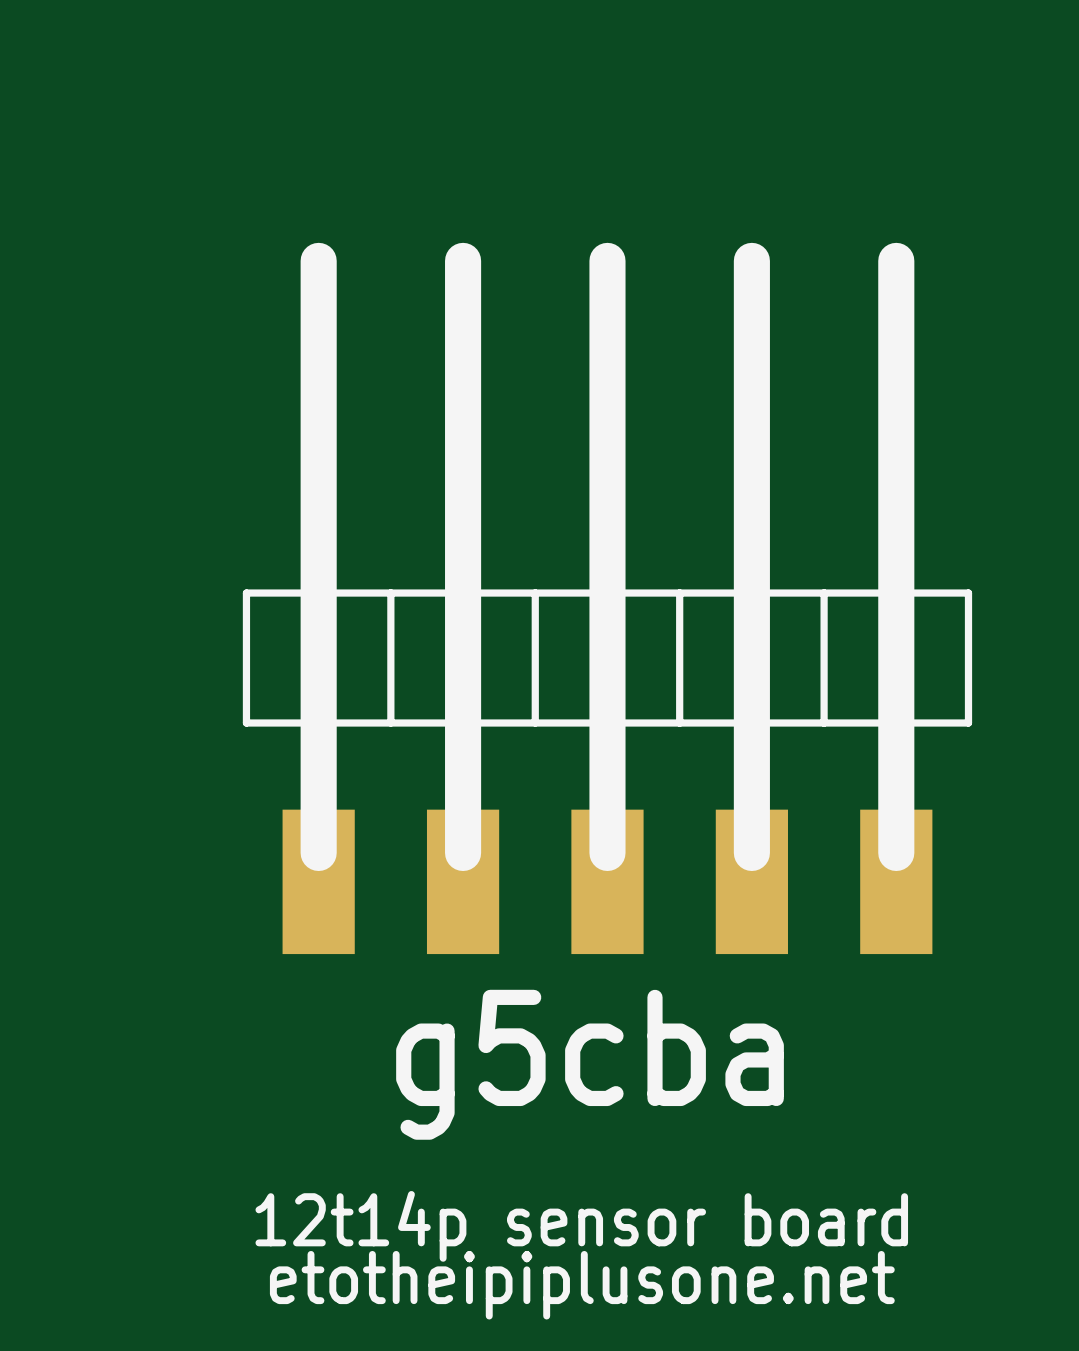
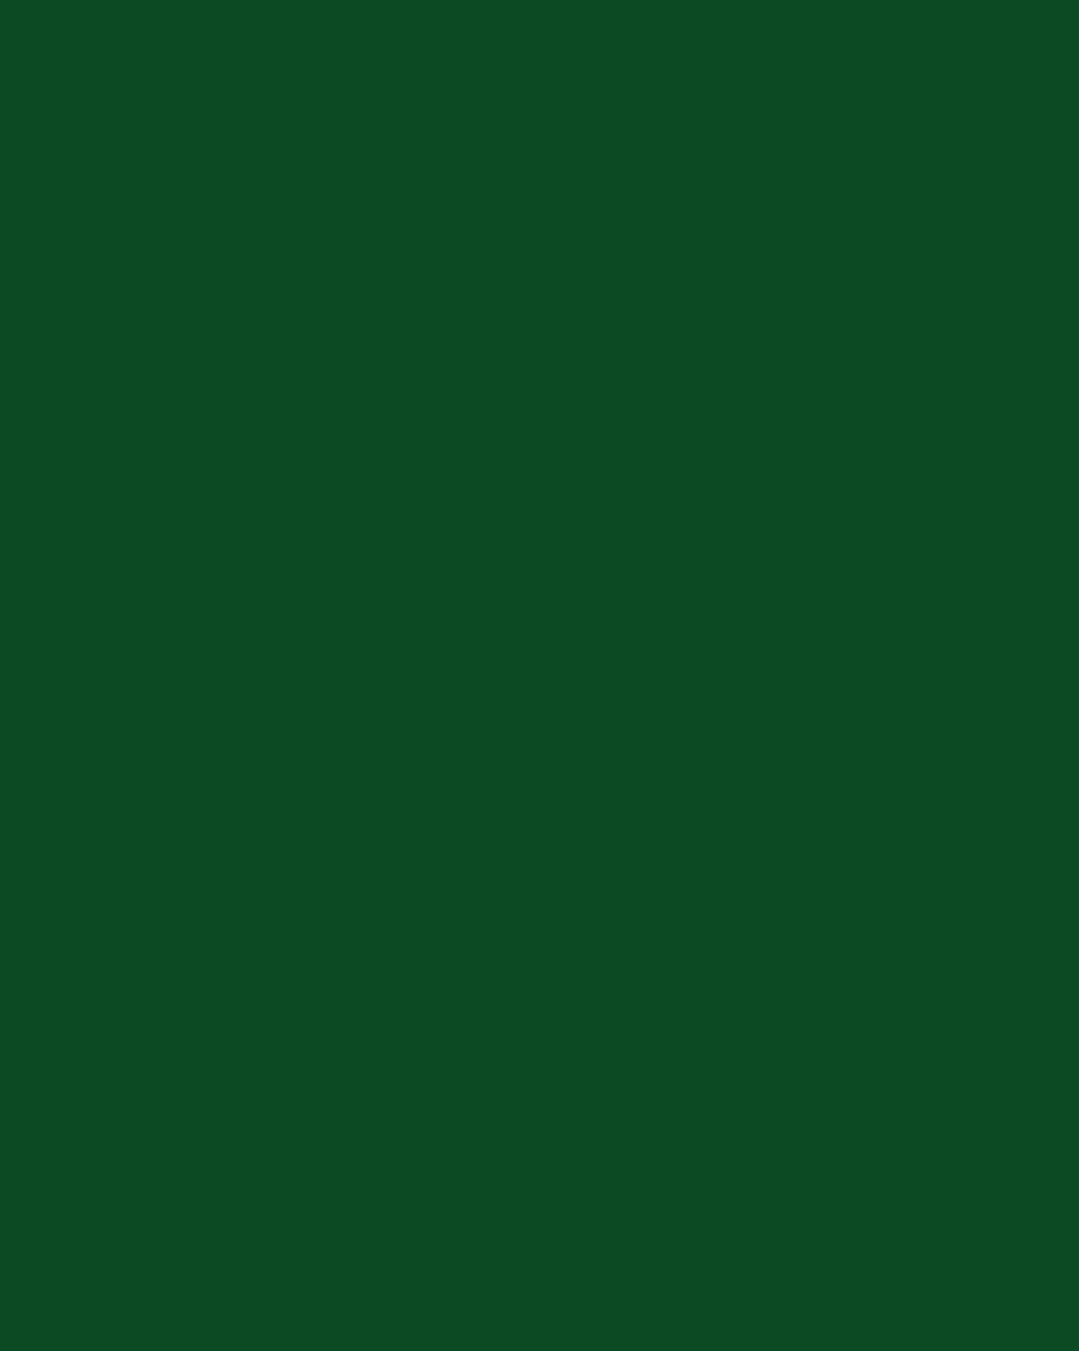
part: (607, 598) -> none
text: g5cba (590, 1064) -> none
text: 12t14p sensor board (581, 1226) -> none
text: etotheipiplusone.net (582, 1285) -> none

